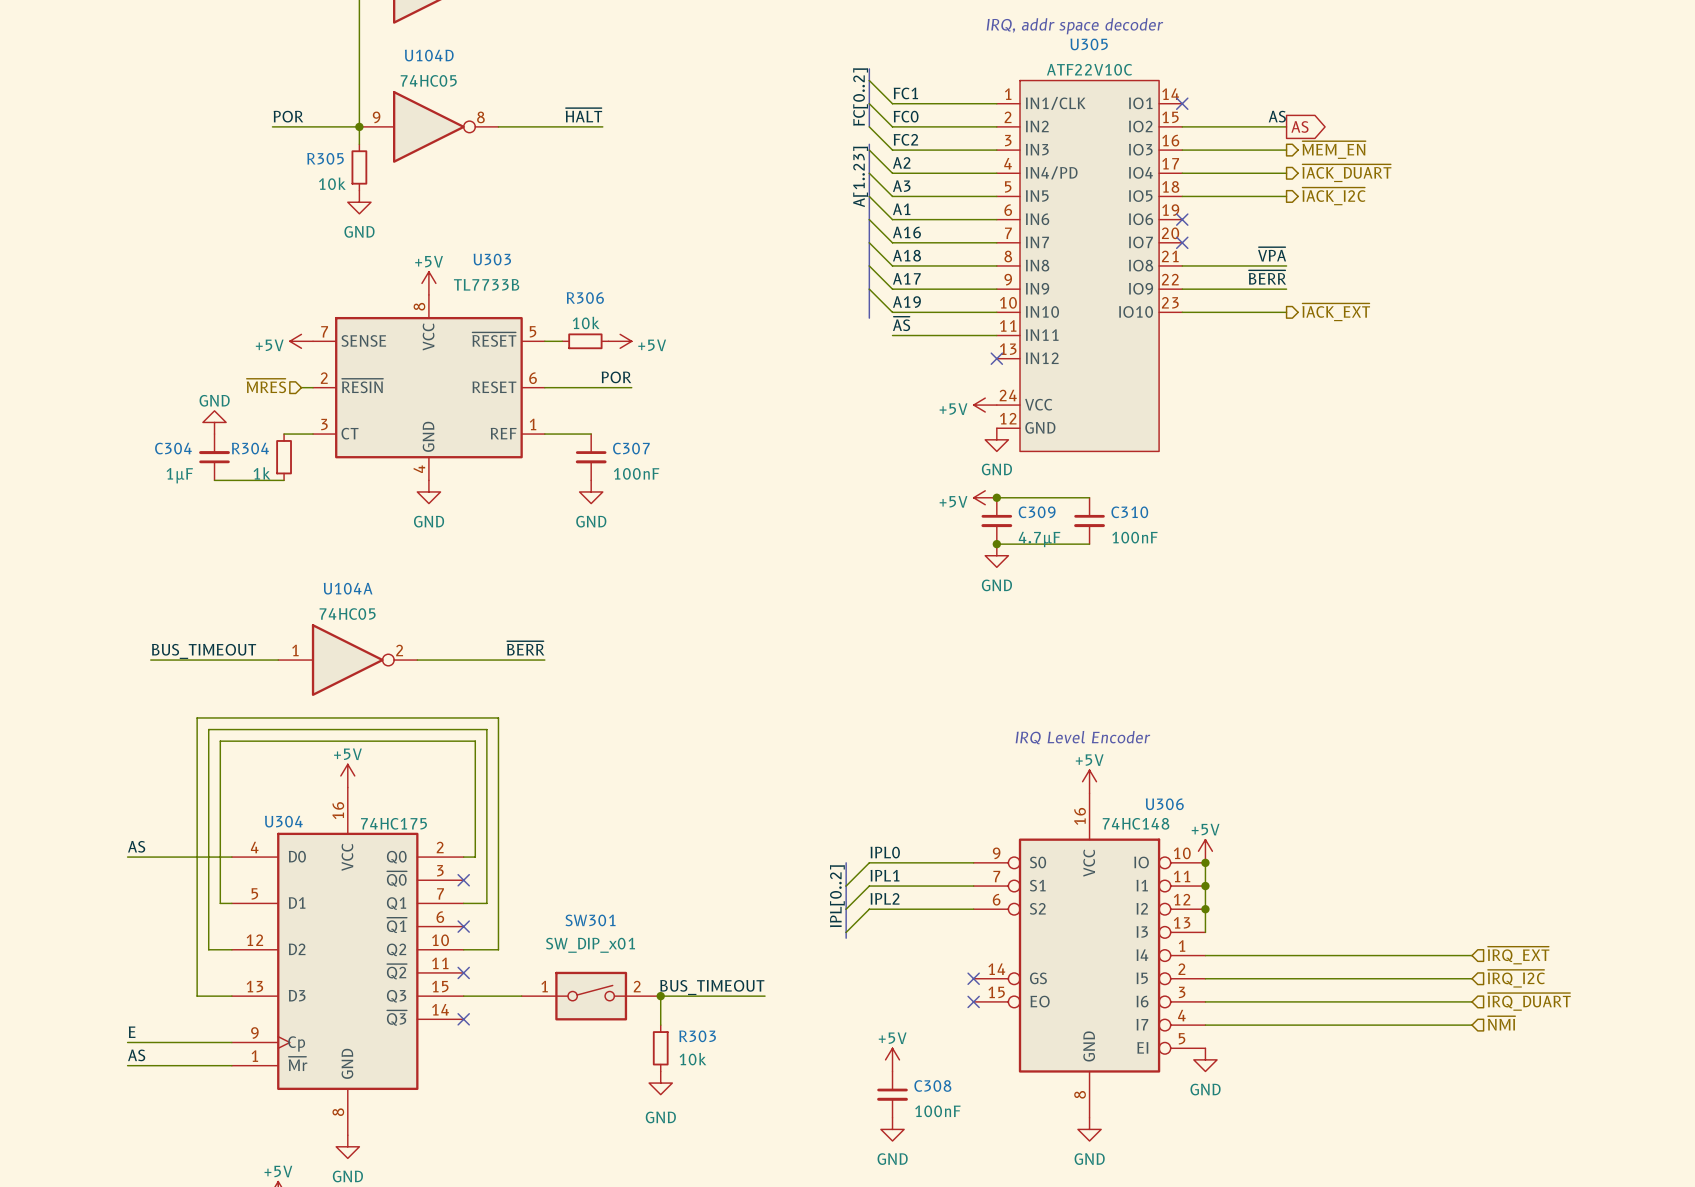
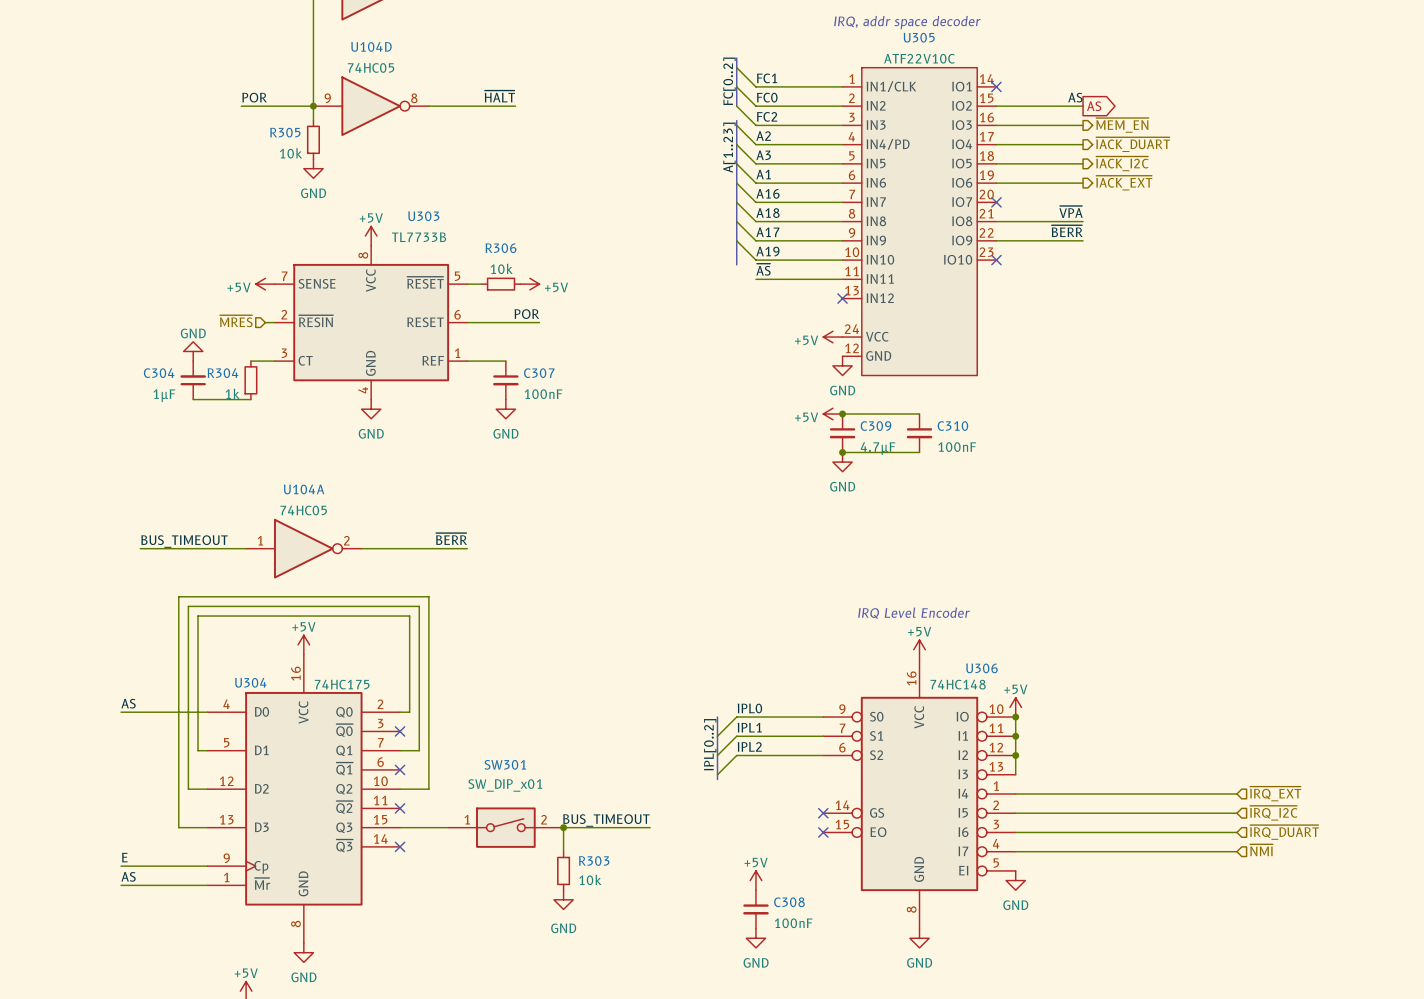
no-connect mark: (1182, 219) -> none
wire: (1182, 312) (1286, 312) -> (996, 183) (1083, 183)
no-connect mark: none -> (996, 260)
hierarchical label position: ~{IACK_EXT} (1336, 312) -> ~{IACK_EXT} (1124, 183)

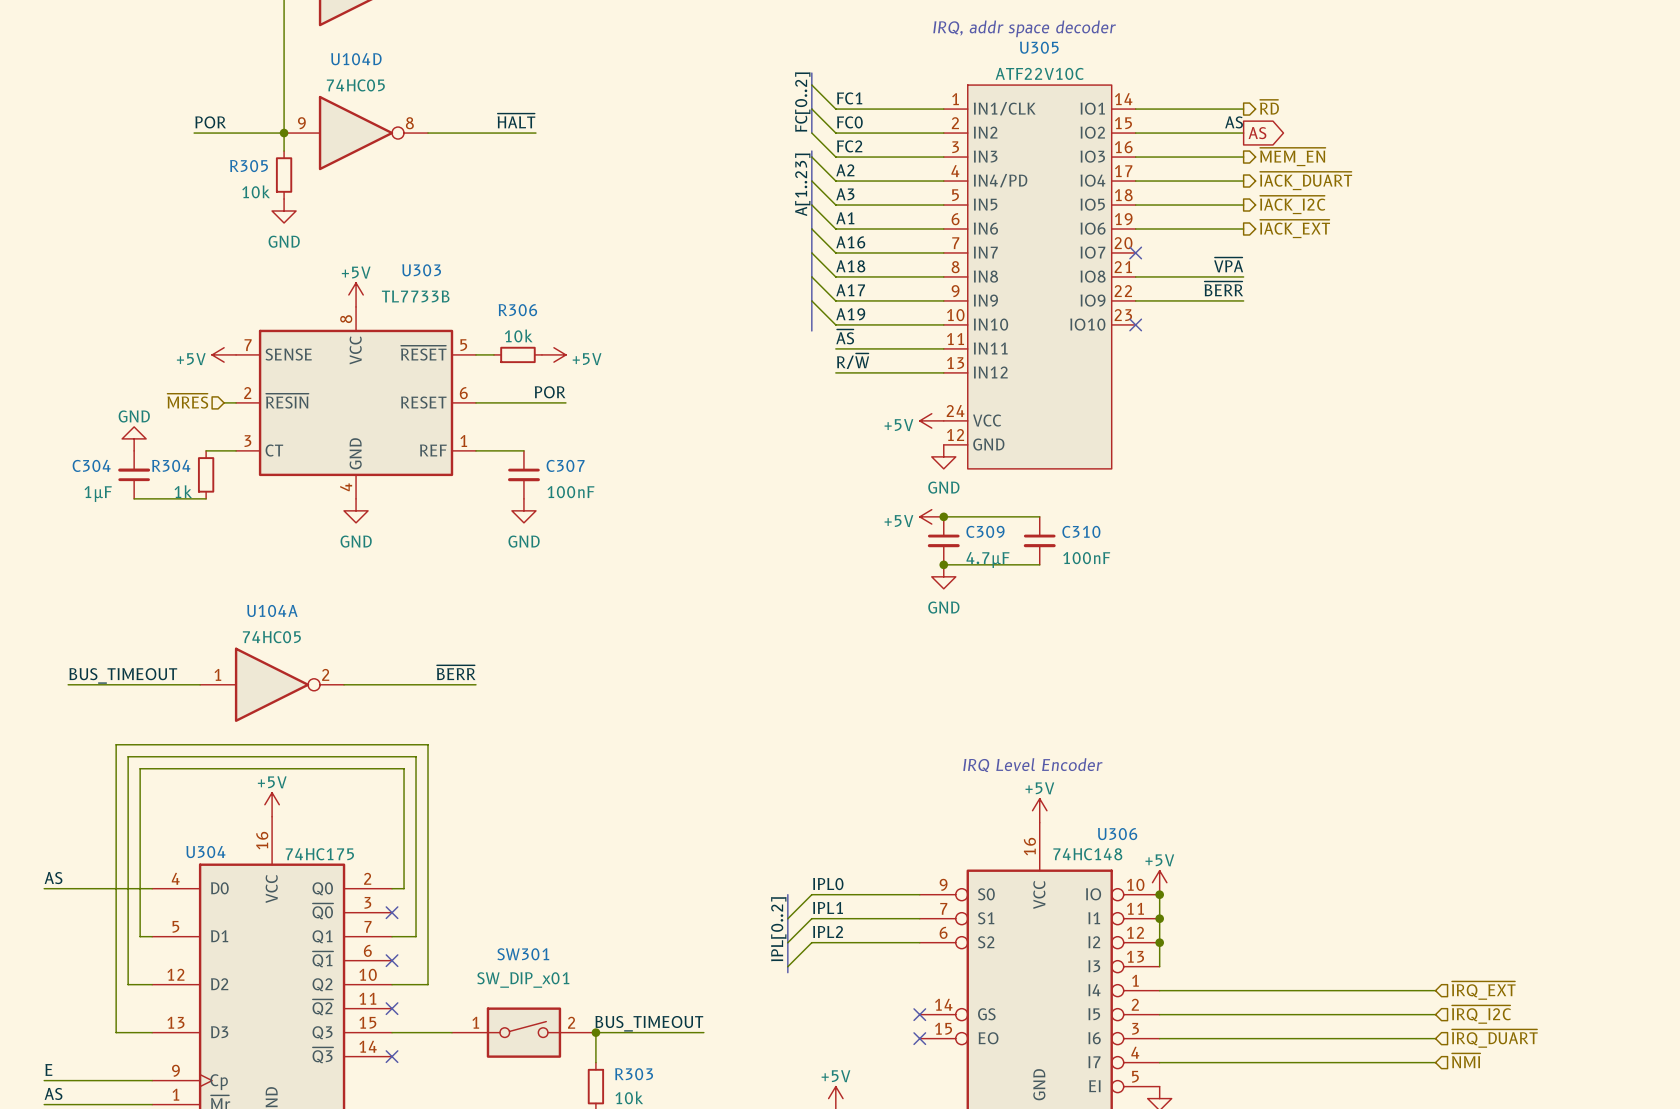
hierarchical label: none -> ~{RD} (1269, 107)
wire: none -> (1135, 109) (1243, 109)
no-connect mark: (996, 86) -> none
label: none -> R/~{W} (853, 361)
wire: none -> (835, 372) (943, 372)
no-connect mark: (842, 298) -> none

